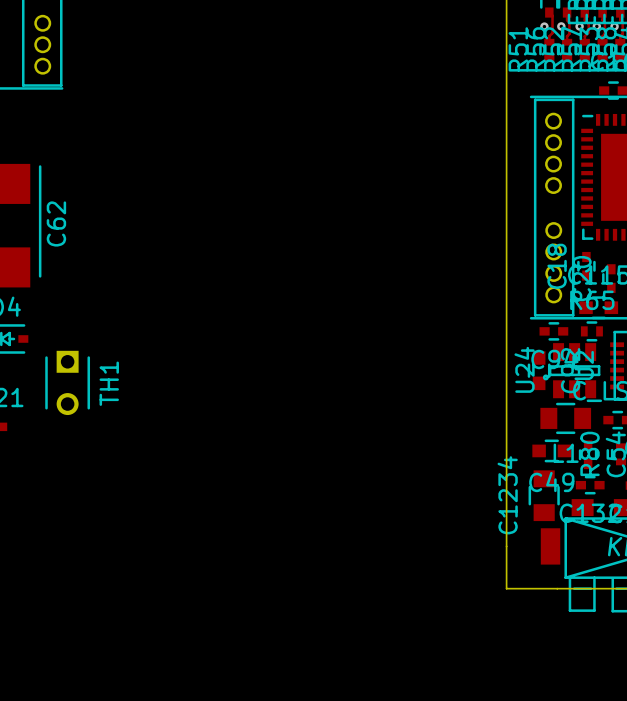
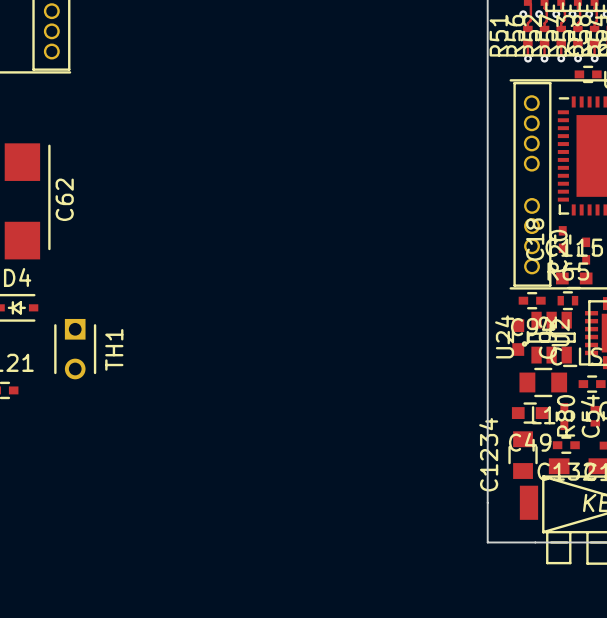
track: none -> (527, 43) (527, 58)
track: none -> (544, 43) (544, 58)
track: none -> (561, 43) (561, 58)
track: none -> (594, 43) (594, 58)
via: none -> (528, 58)
via: none -> (544, 58)
via: none -> (561, 58)
via: none -> (578, 58)
via: none -> (594, 58)

